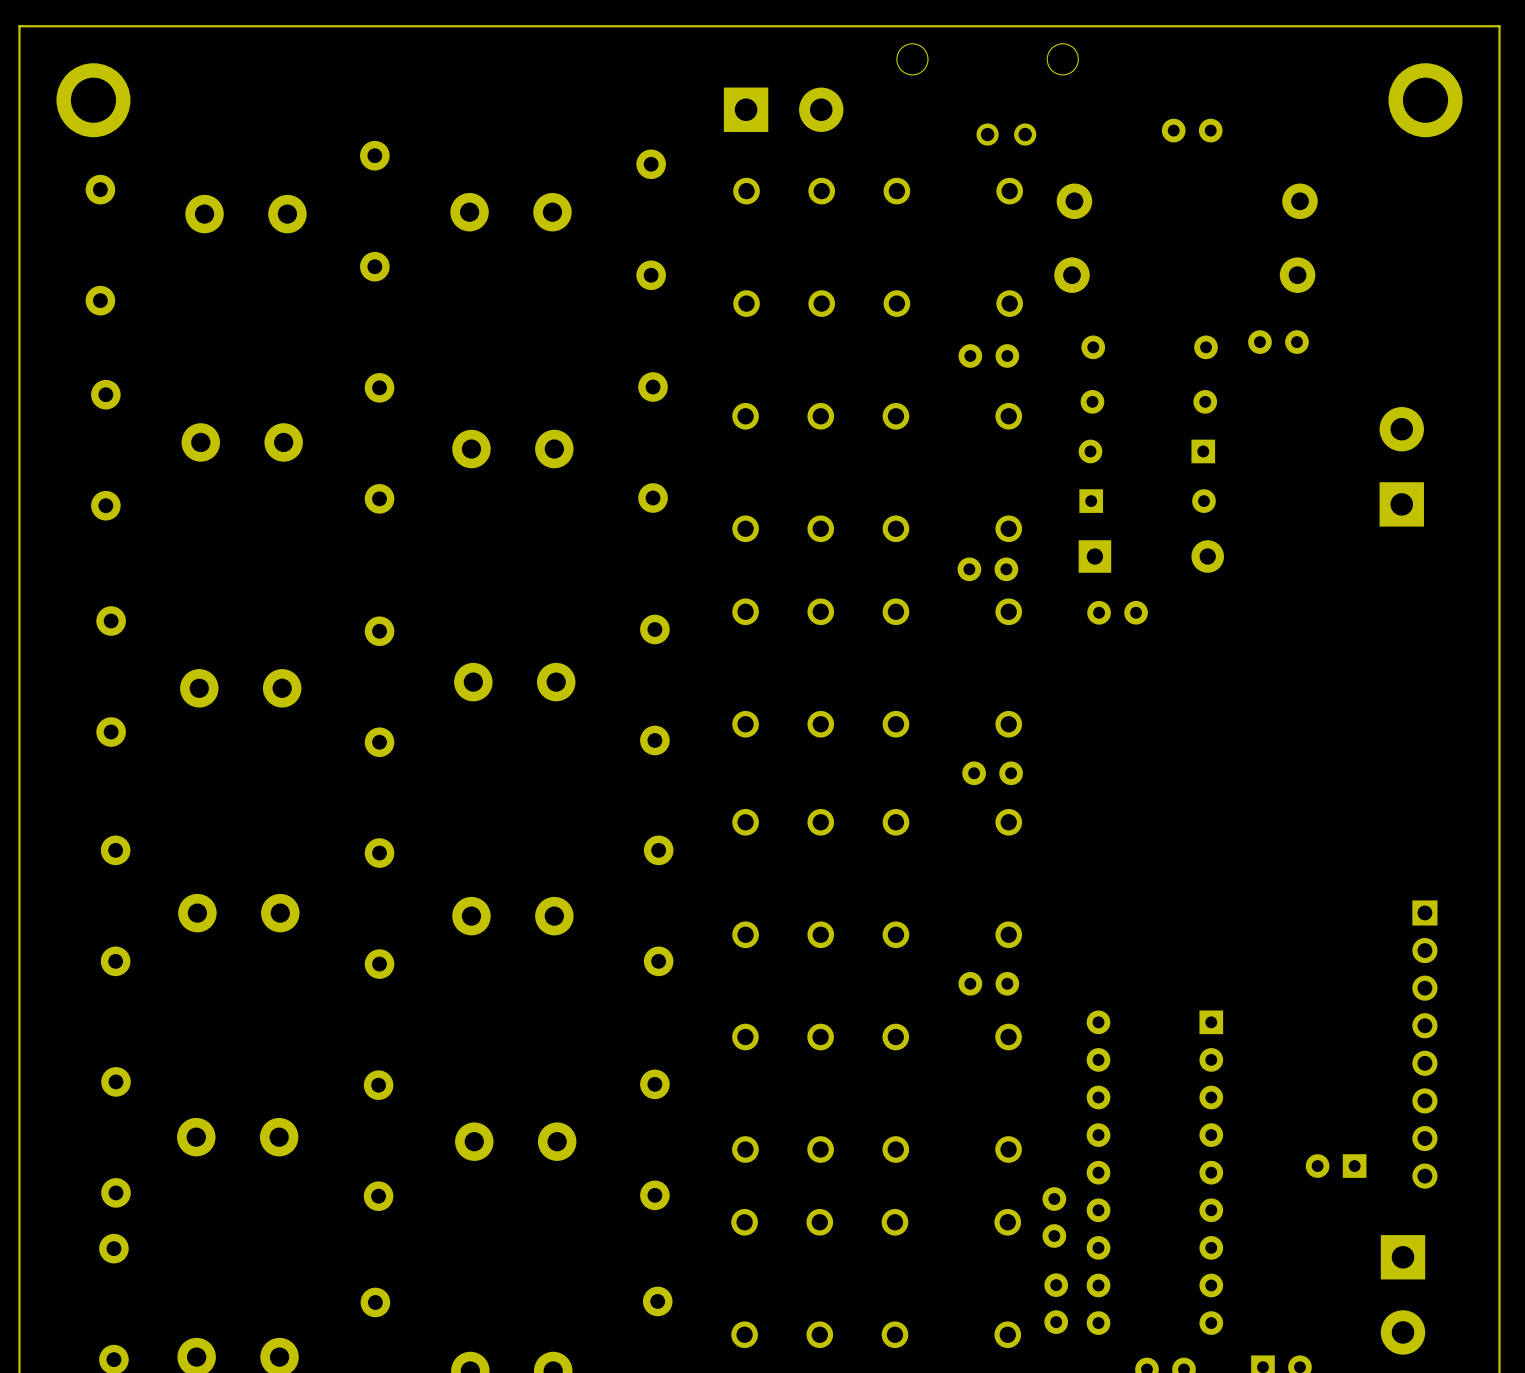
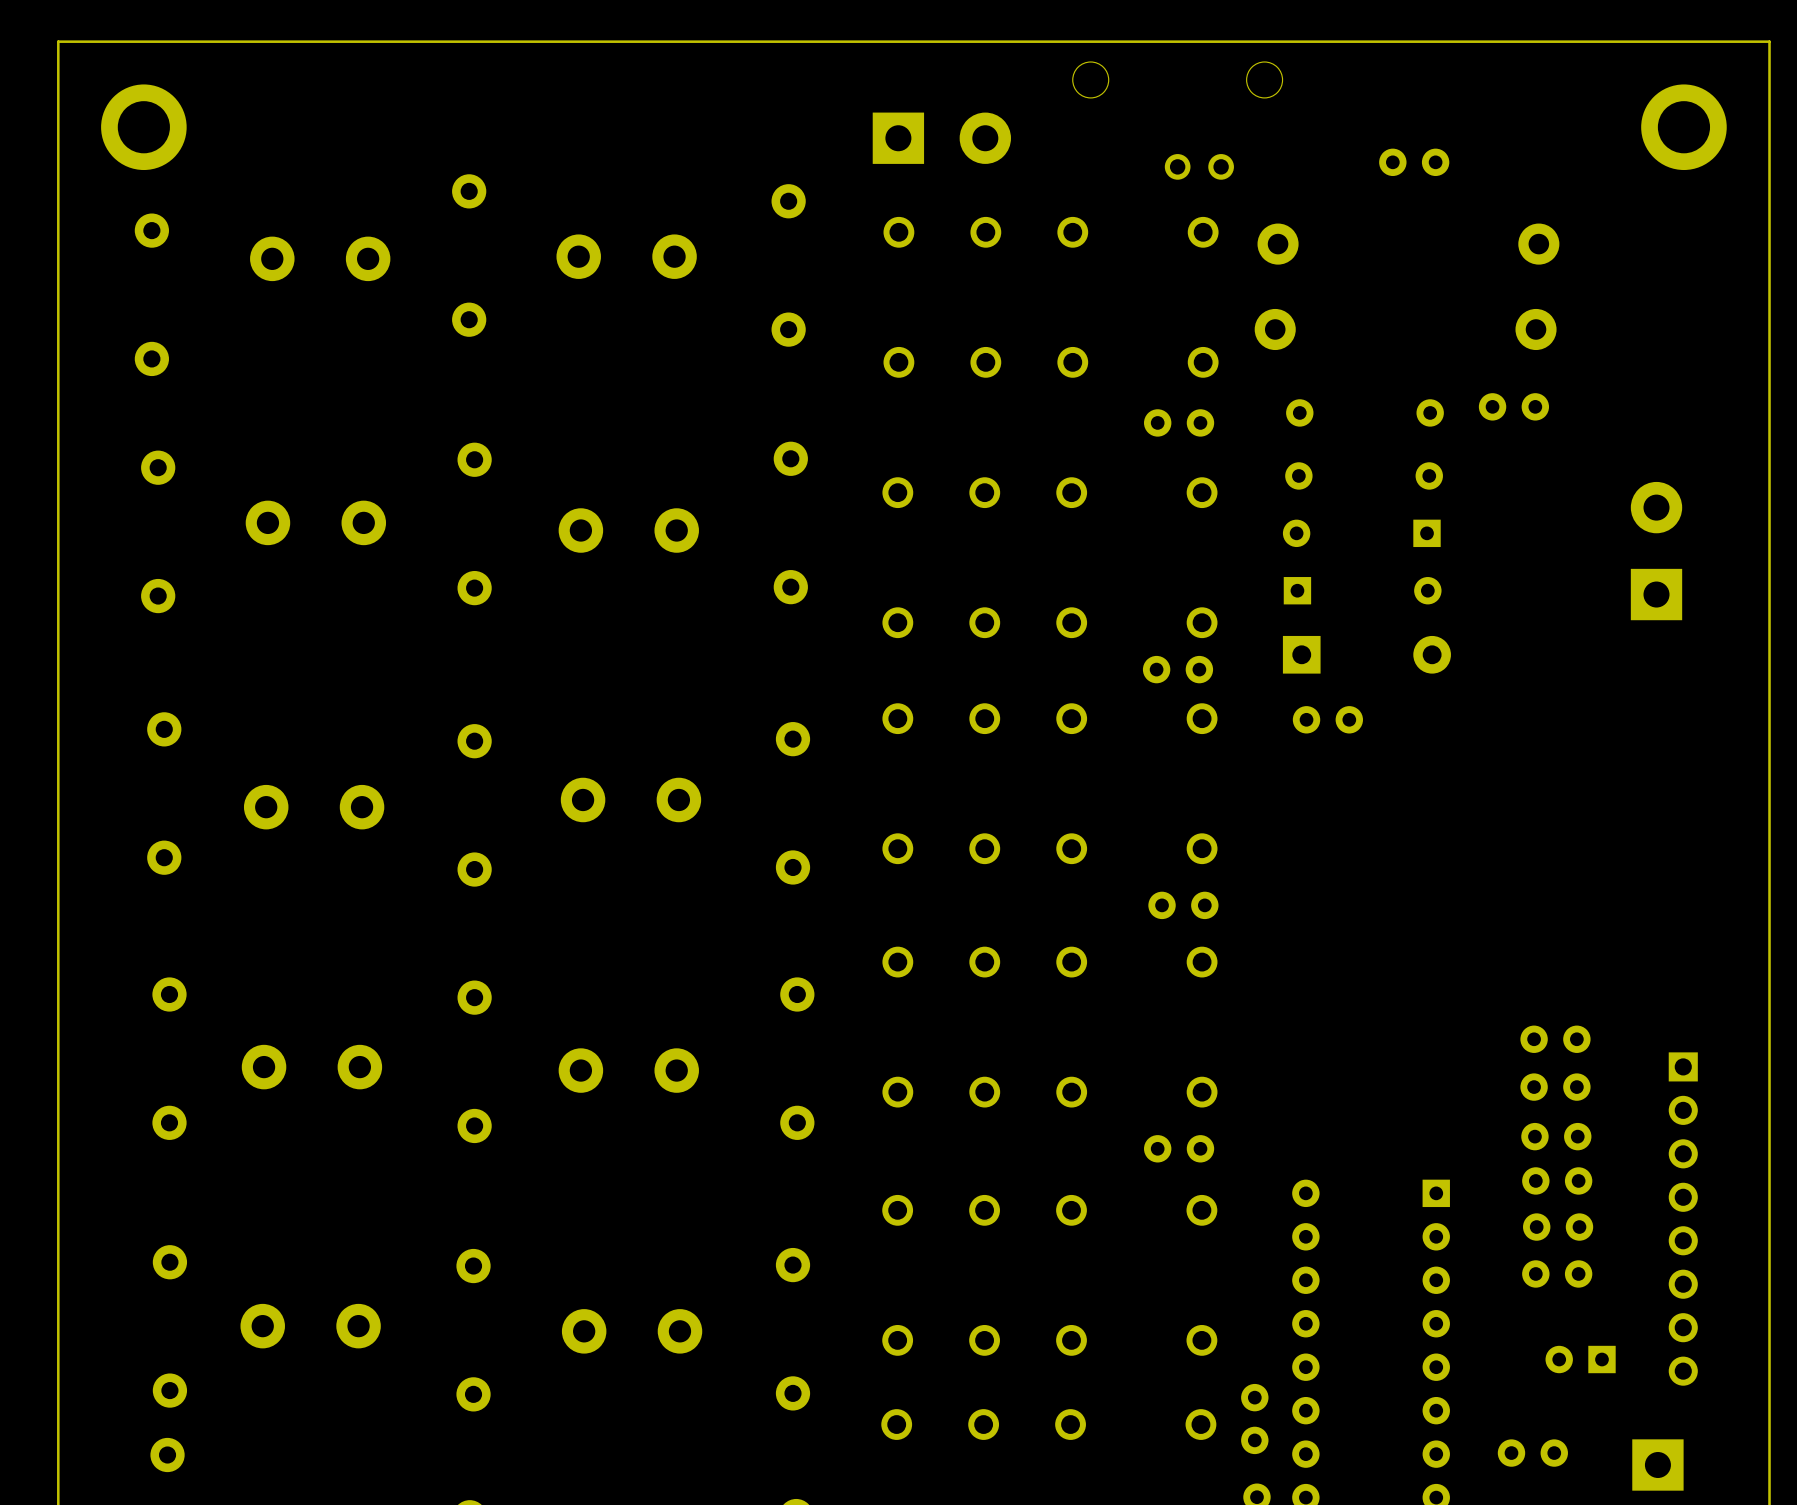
part: none -> (1555, 1039)
part: none -> (1555, 1087)
part: none -> (1556, 1136)
part: none -> (1557, 1180)
part: none -> (1558, 1227)
part: none -> (1557, 1273)
part: none -> (1532, 1453)

